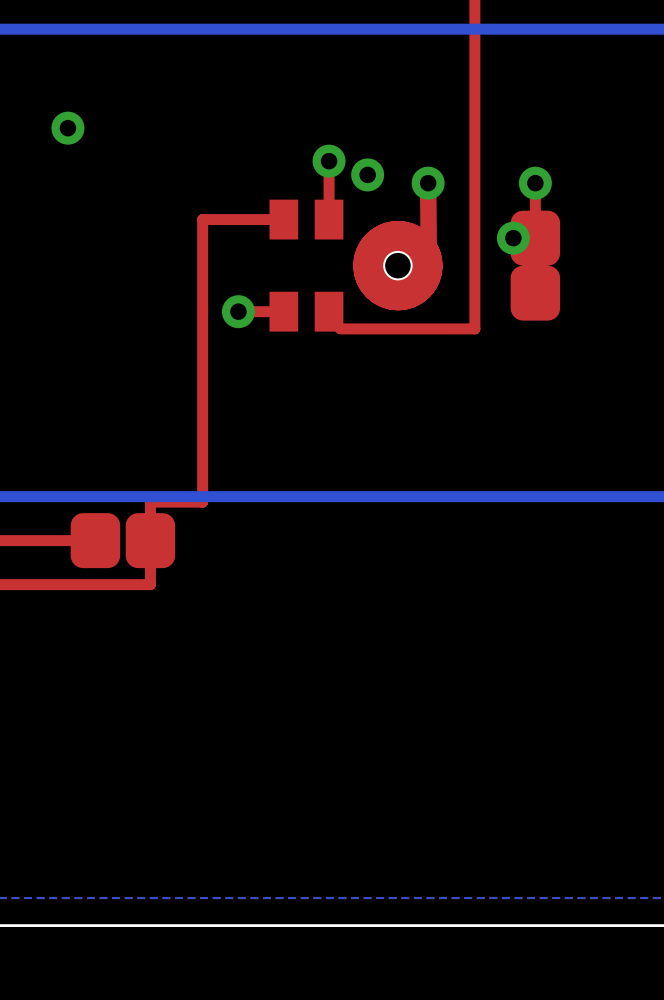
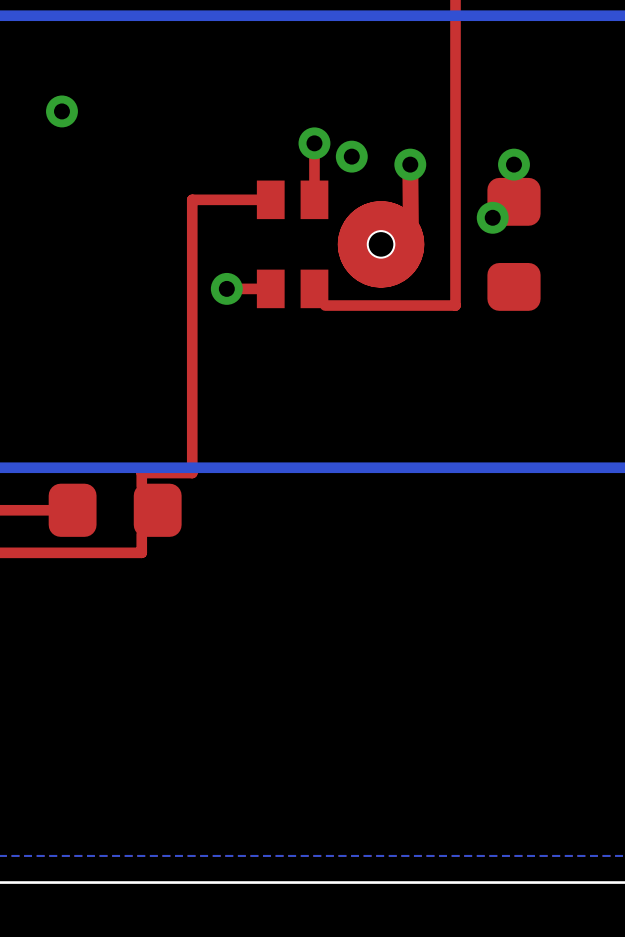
part footprint: [510, 210, 561, 321] -> [487, 177, 541, 311]
part footprint: [70, 513, 176, 569] -> [48, 483, 182, 537]

